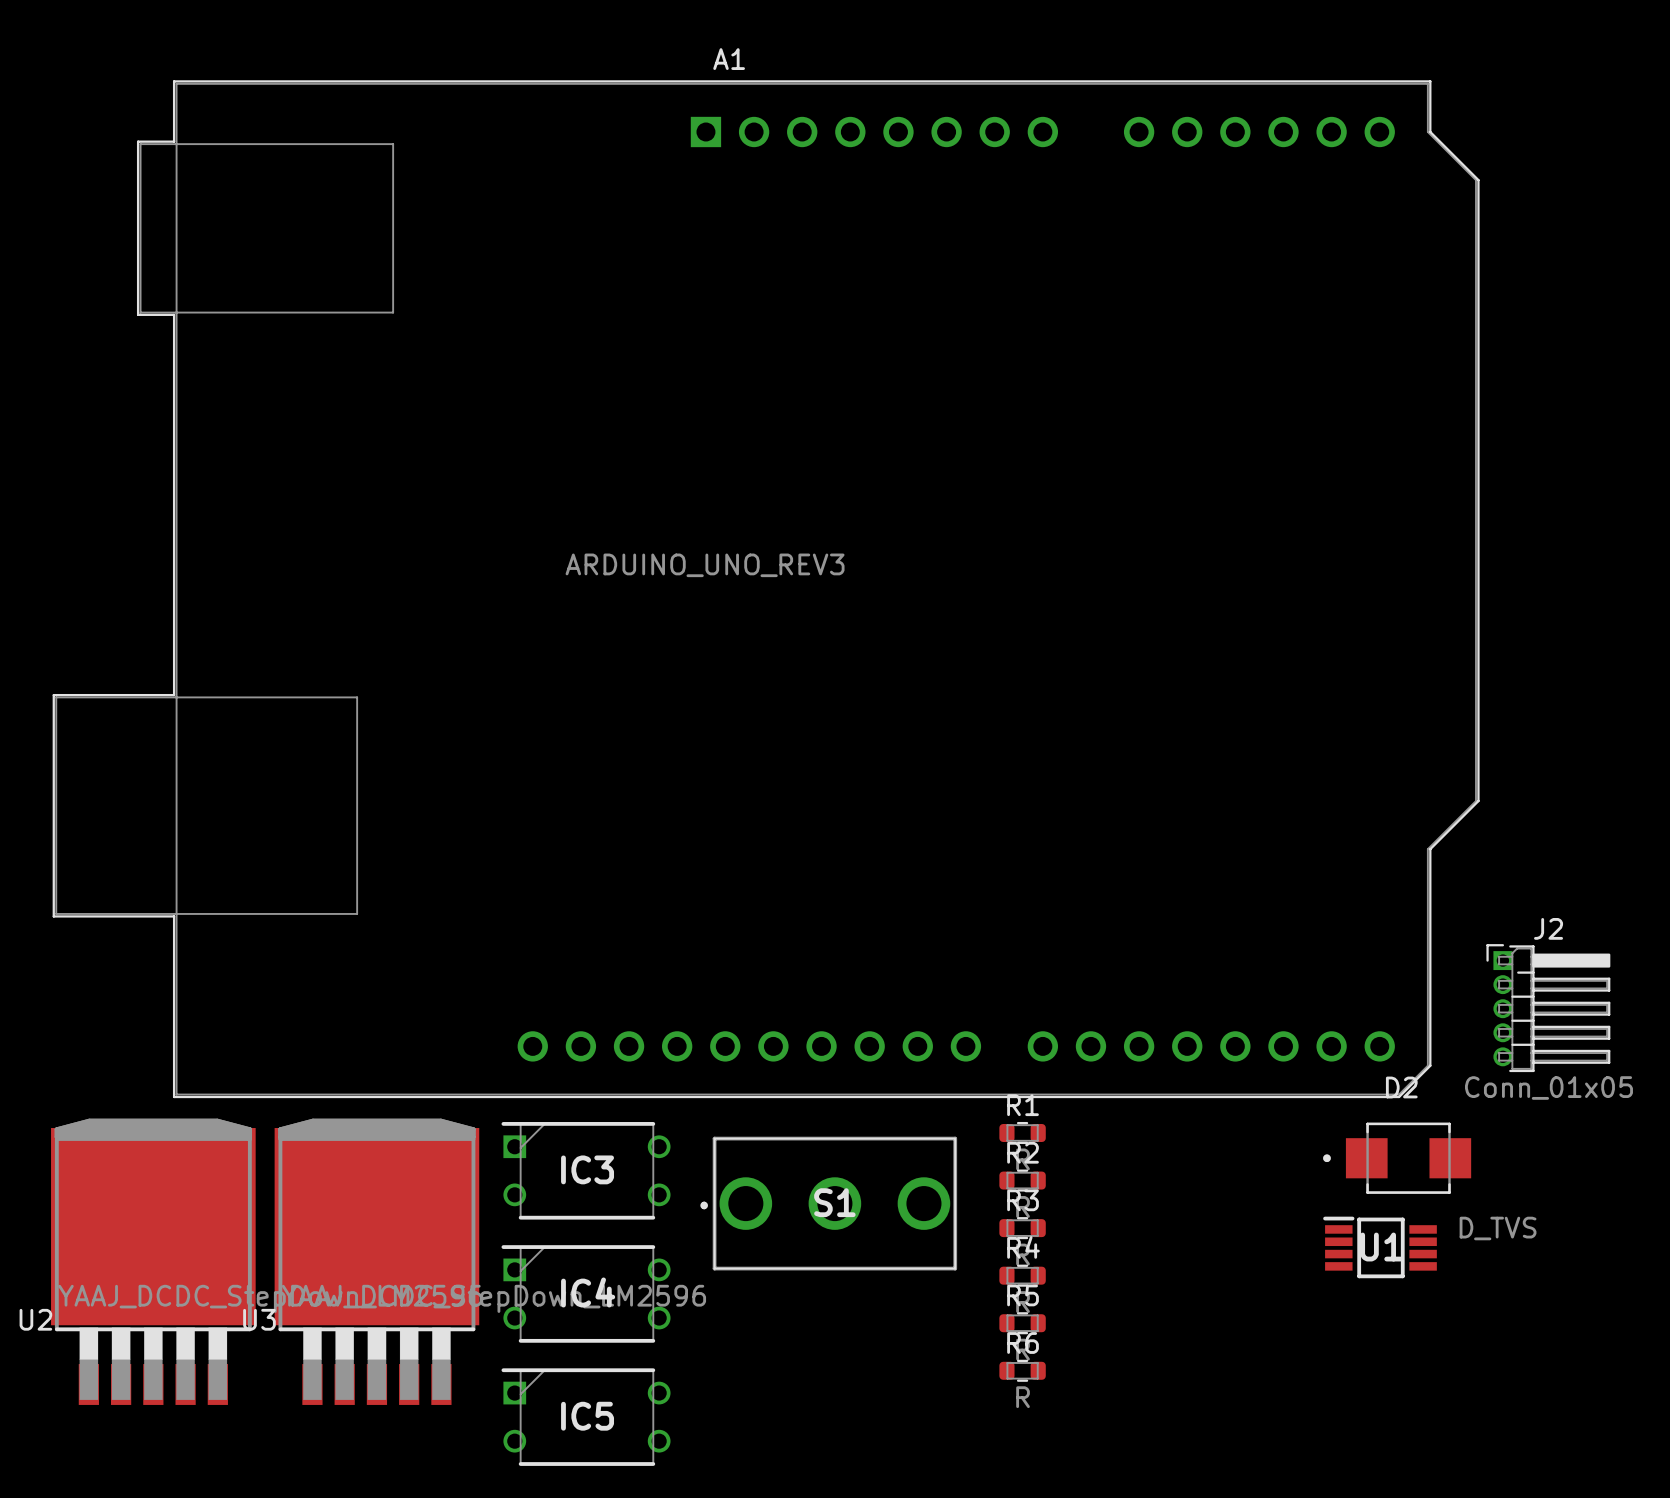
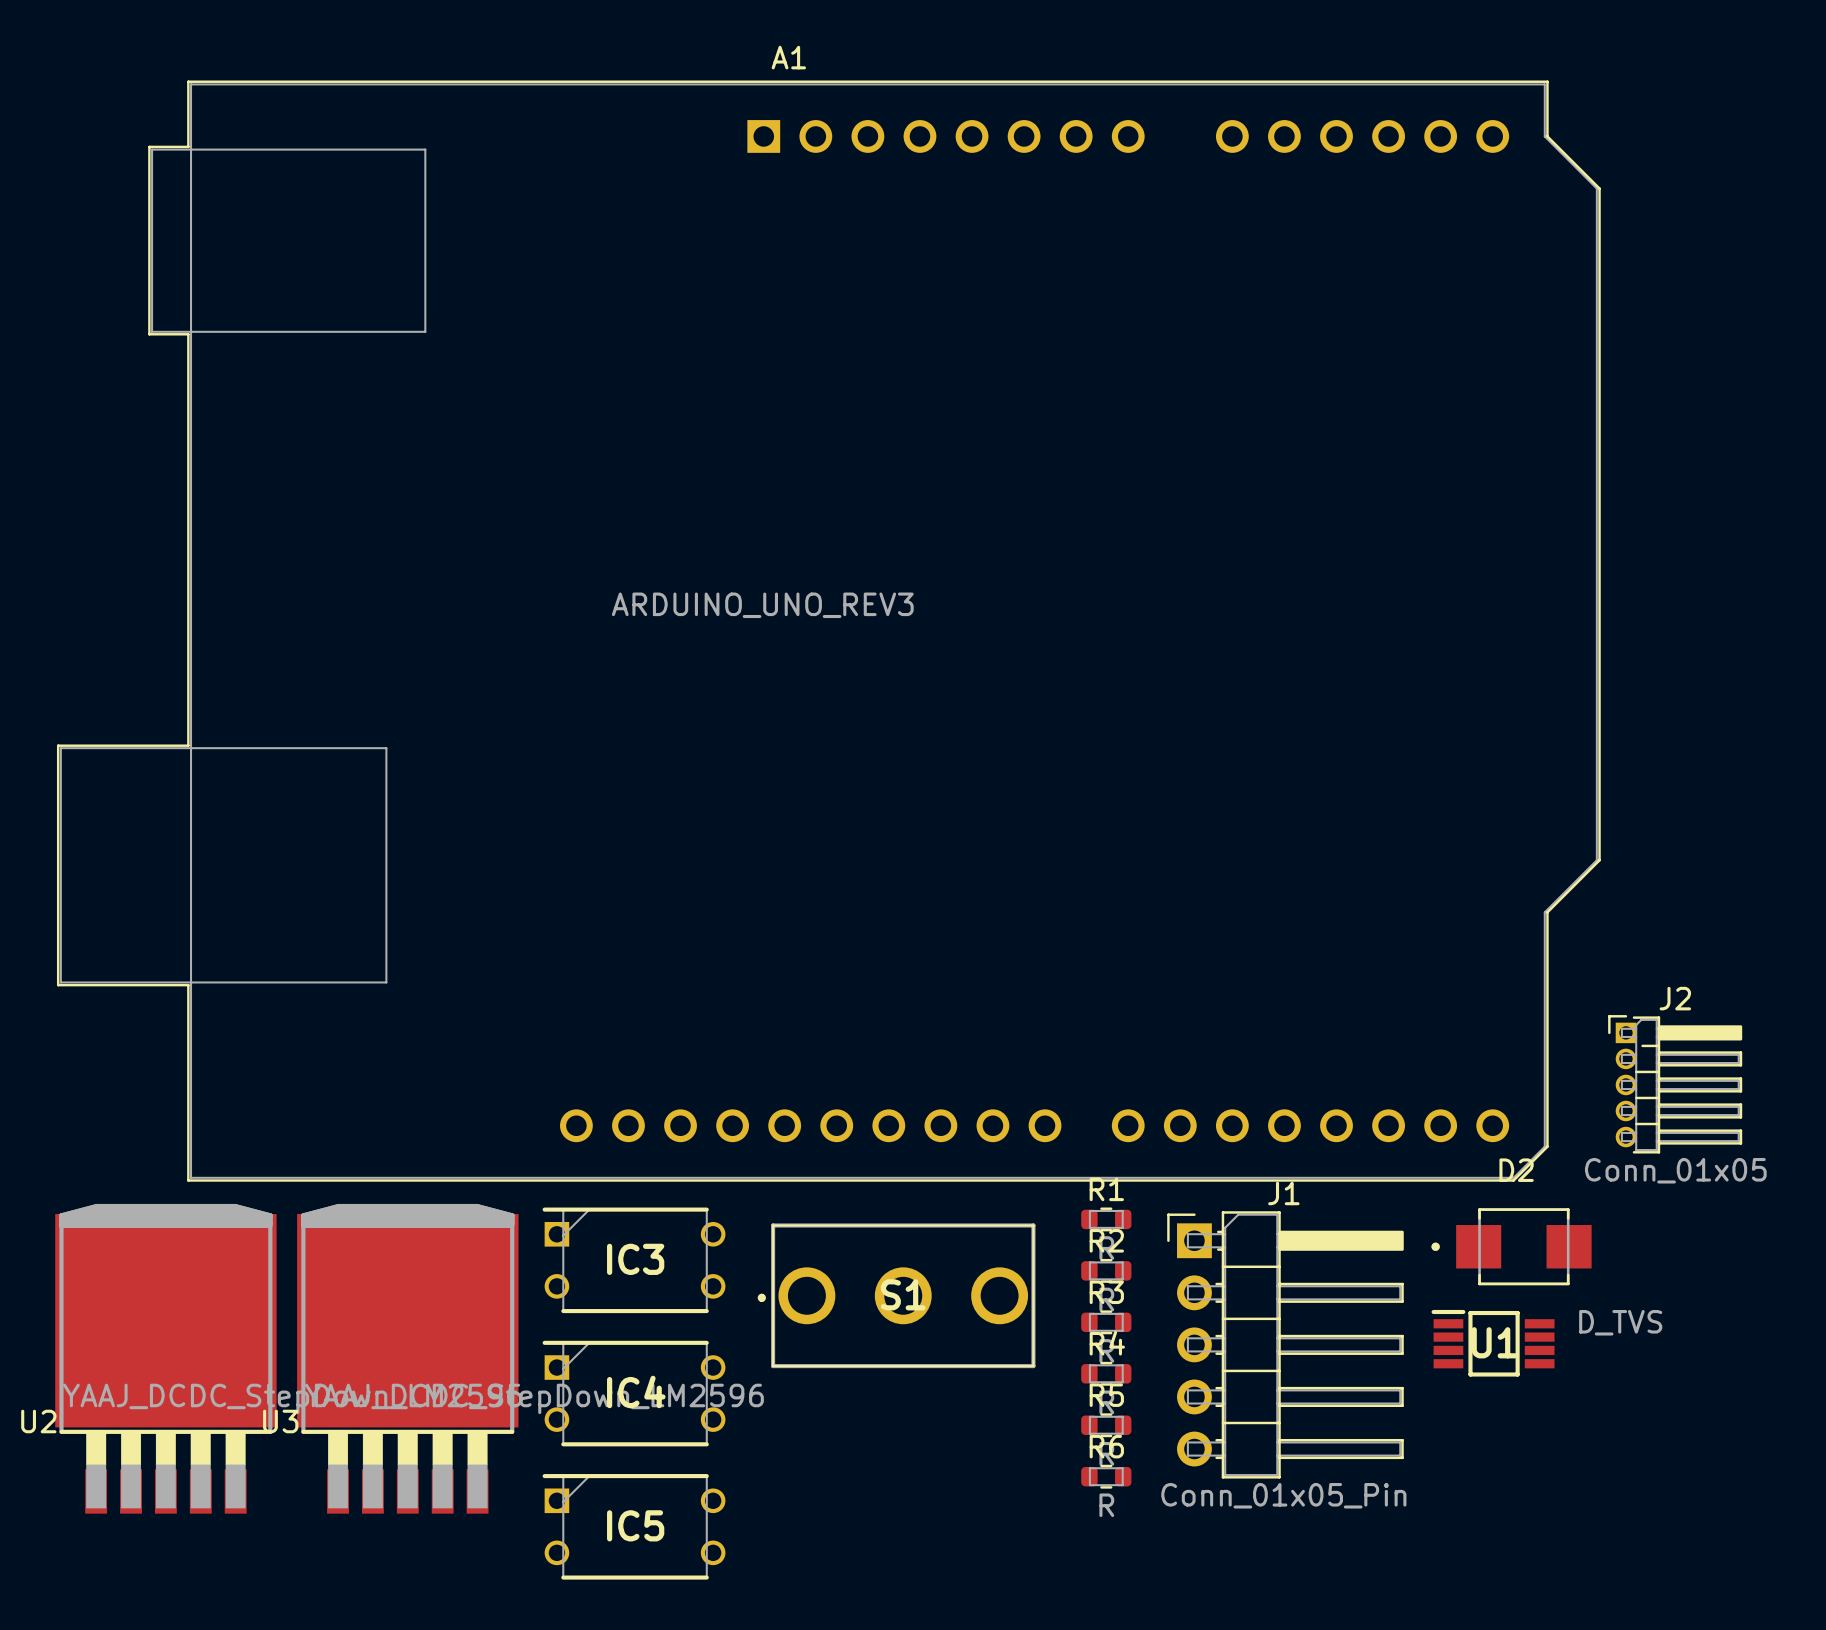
J1: none -> Conn_01x05_Pin (1285, 1344)

